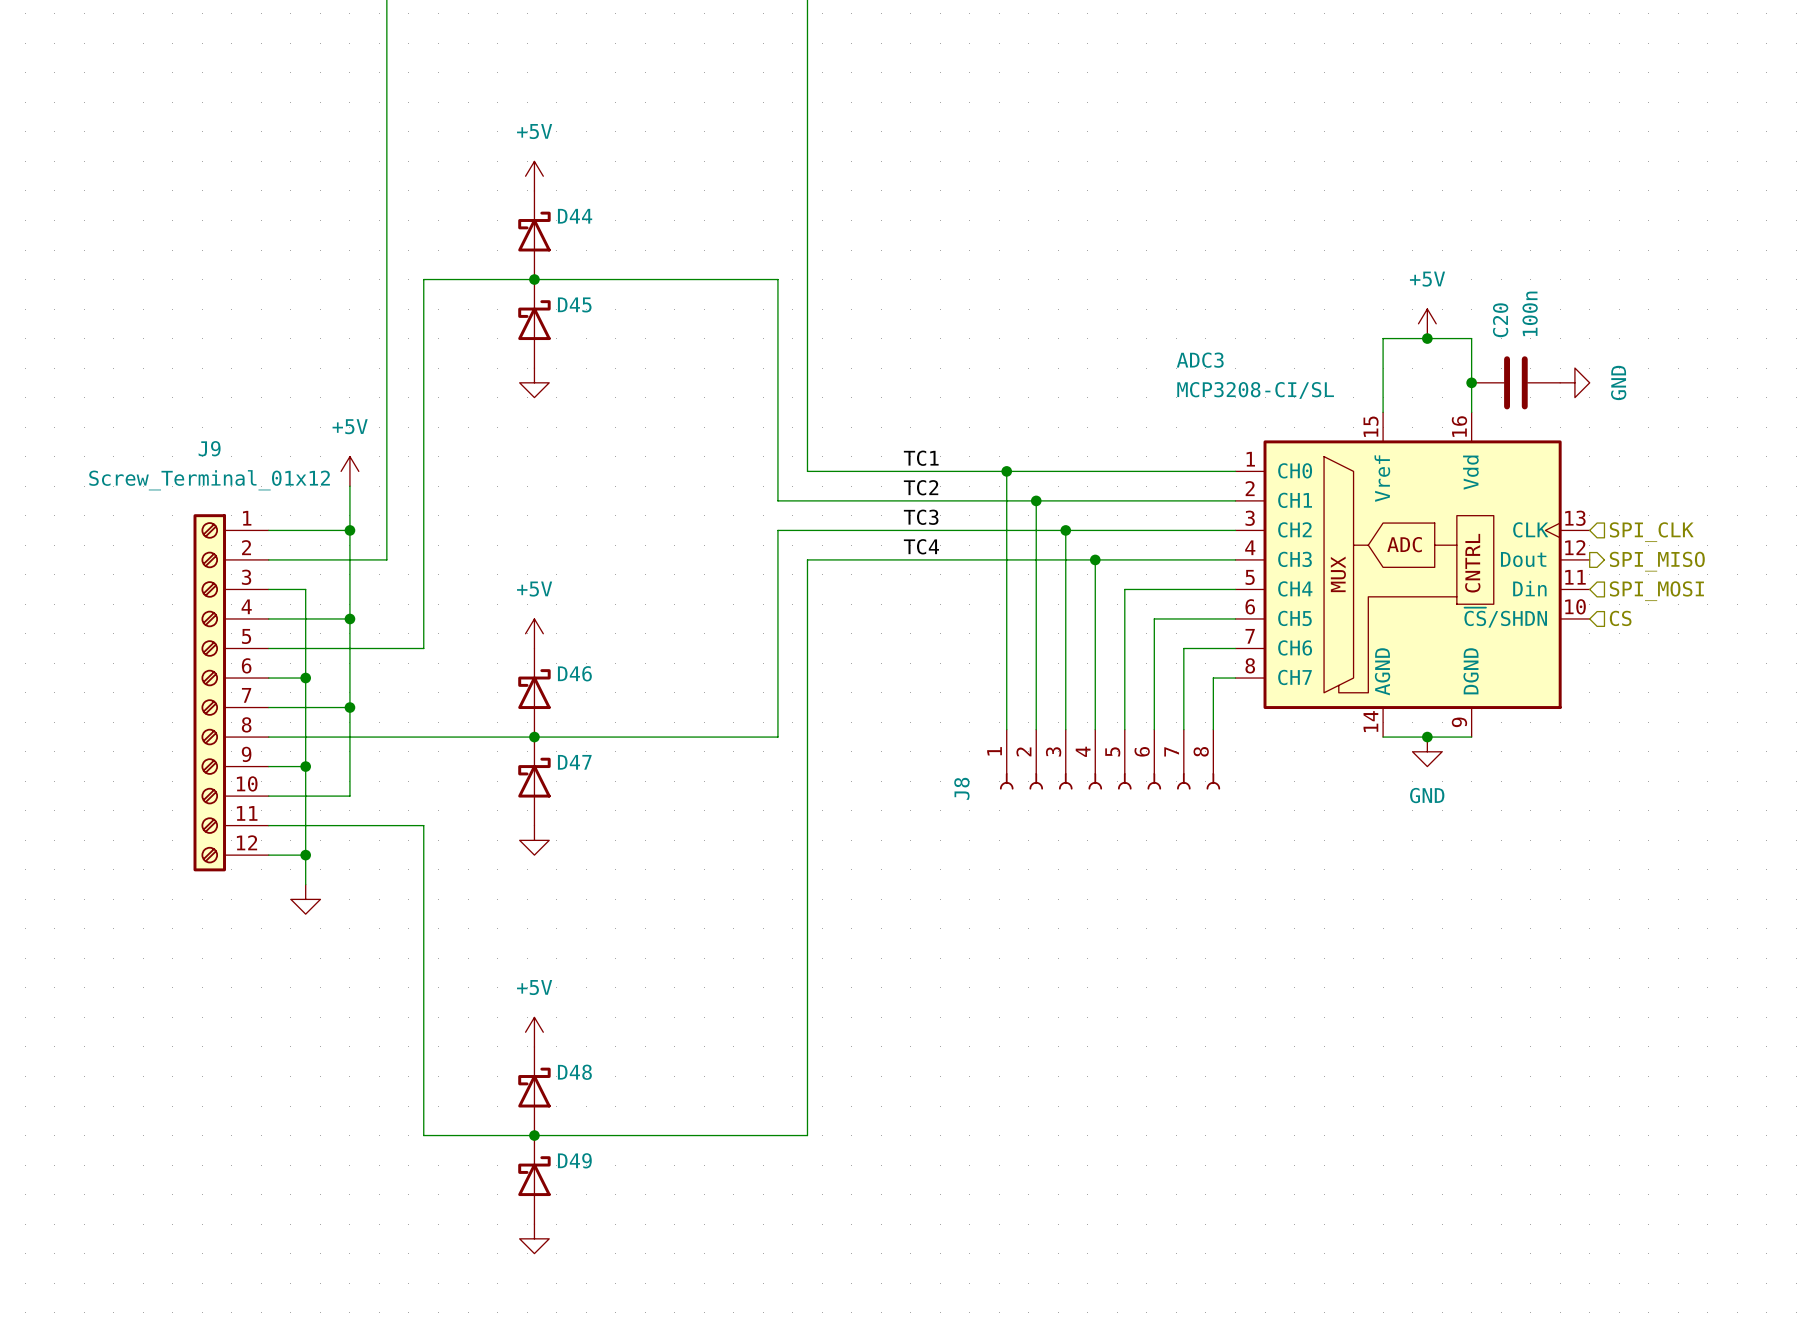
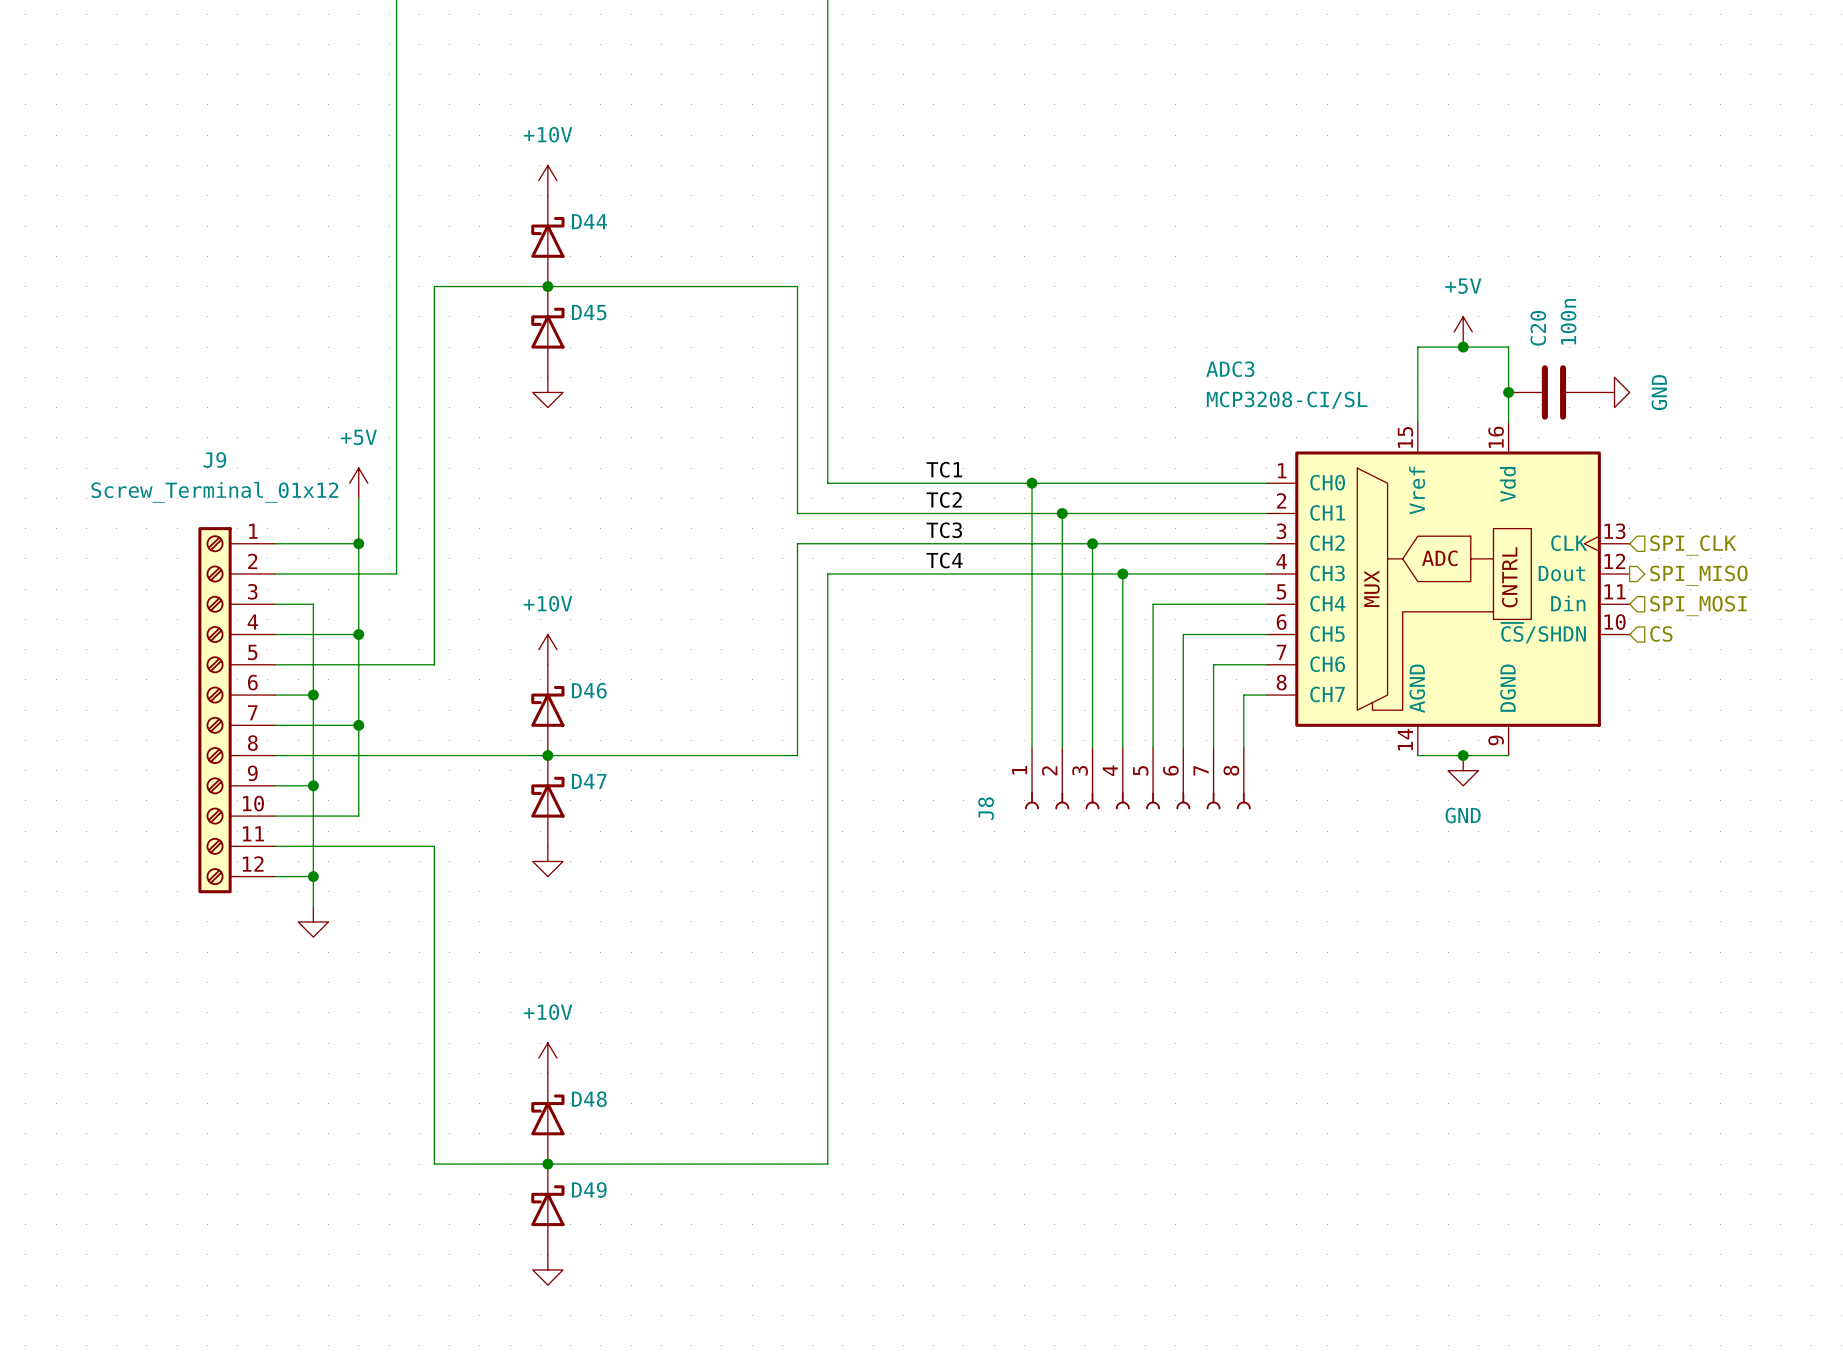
power symbol: +5V (534, 176) -> +10V (547, 180)
power symbol: +5V (534, 633) -> +10V (547, 649)
power symbol: +5V (534, 1032) -> +10V (547, 1058)

